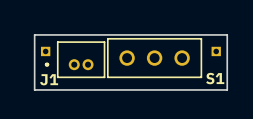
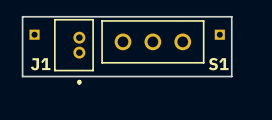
J1 rotation: 0° (74, 59) -> 90° counterclockwise (73, 51)

